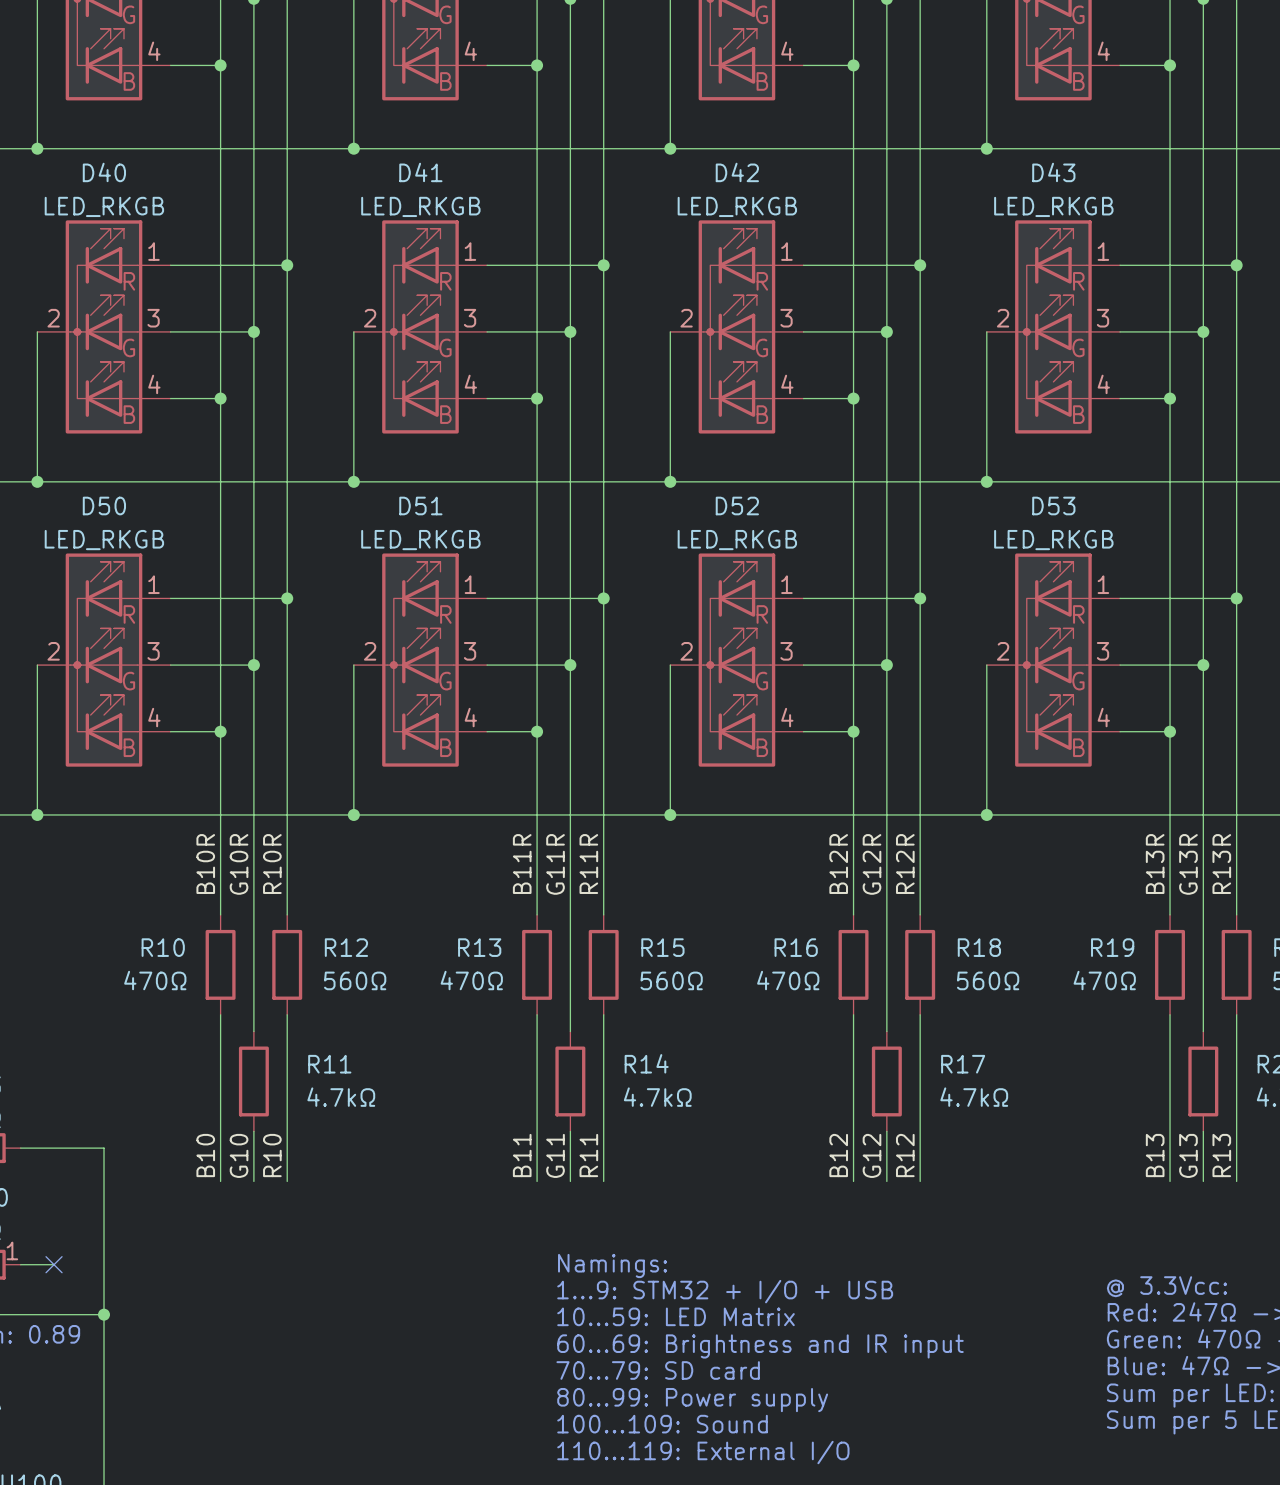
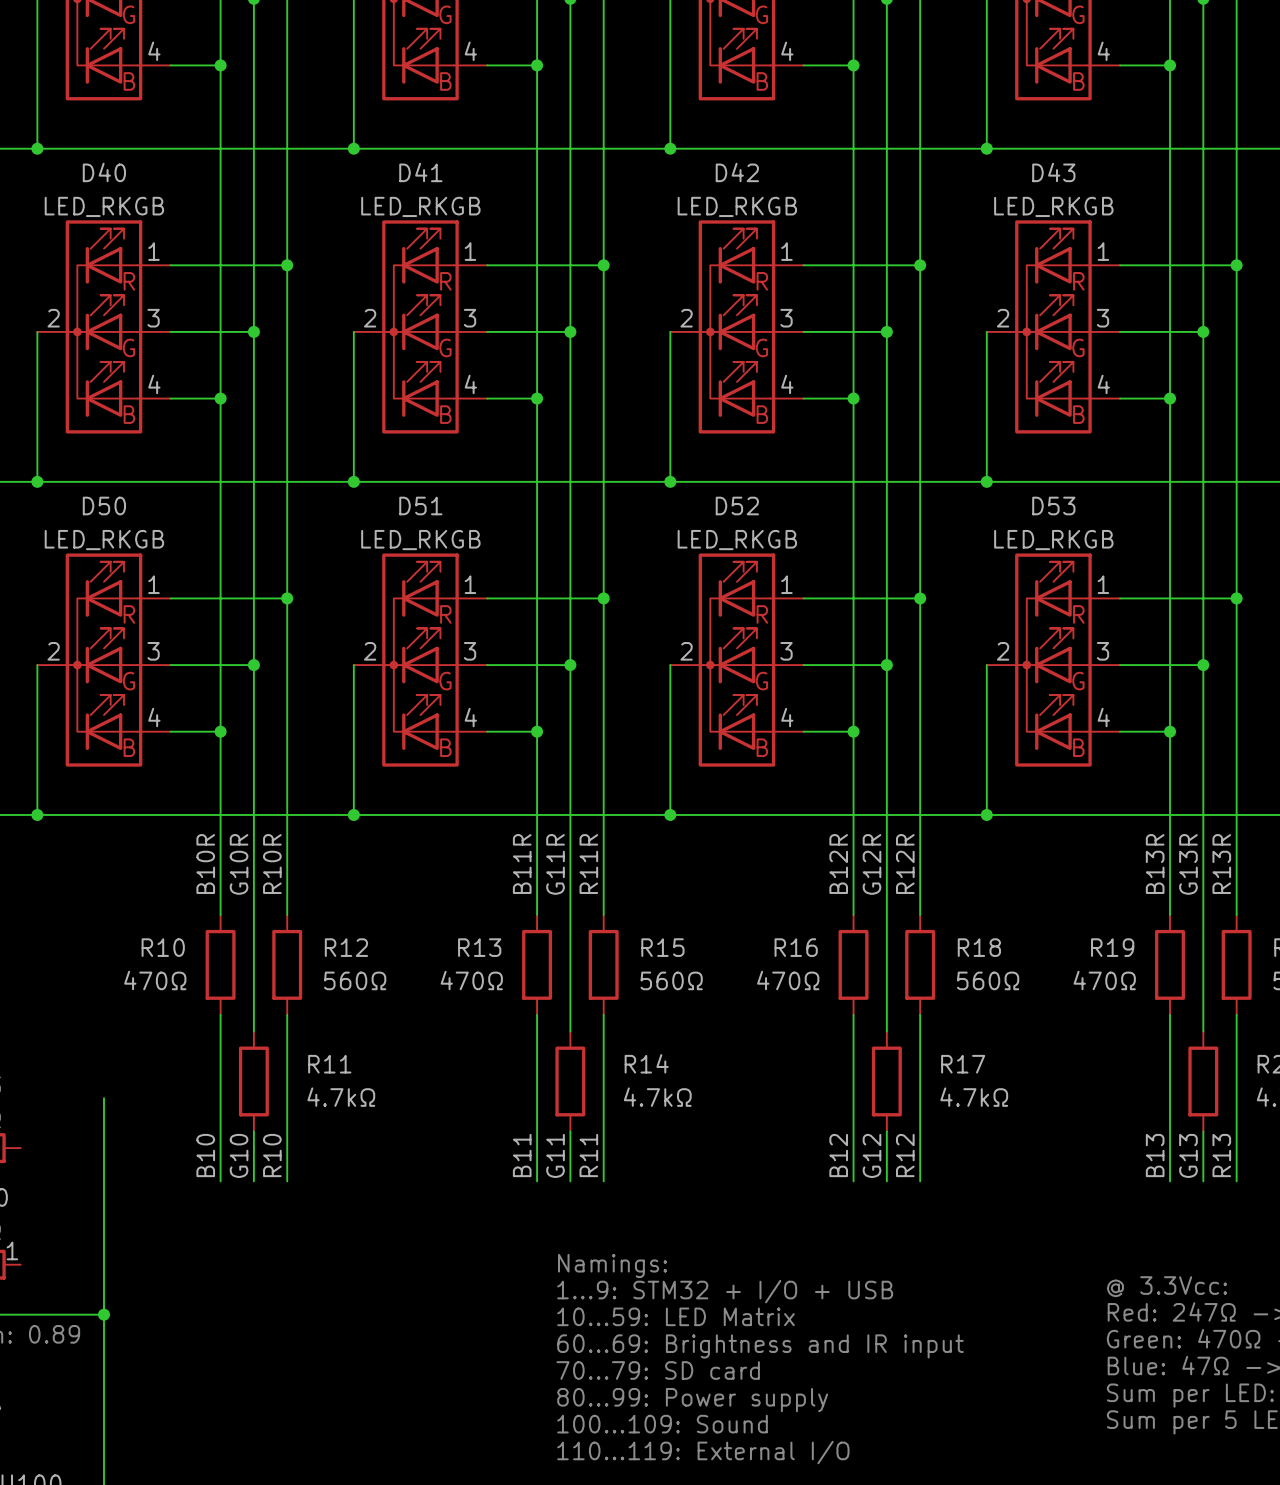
wire: (20, 1148) (104, 1148) -> (104, 1098) (104, 1148)
wire: (20, 1264) (54, 1264) -> none
no-connect mark: (54, 1264) -> none

